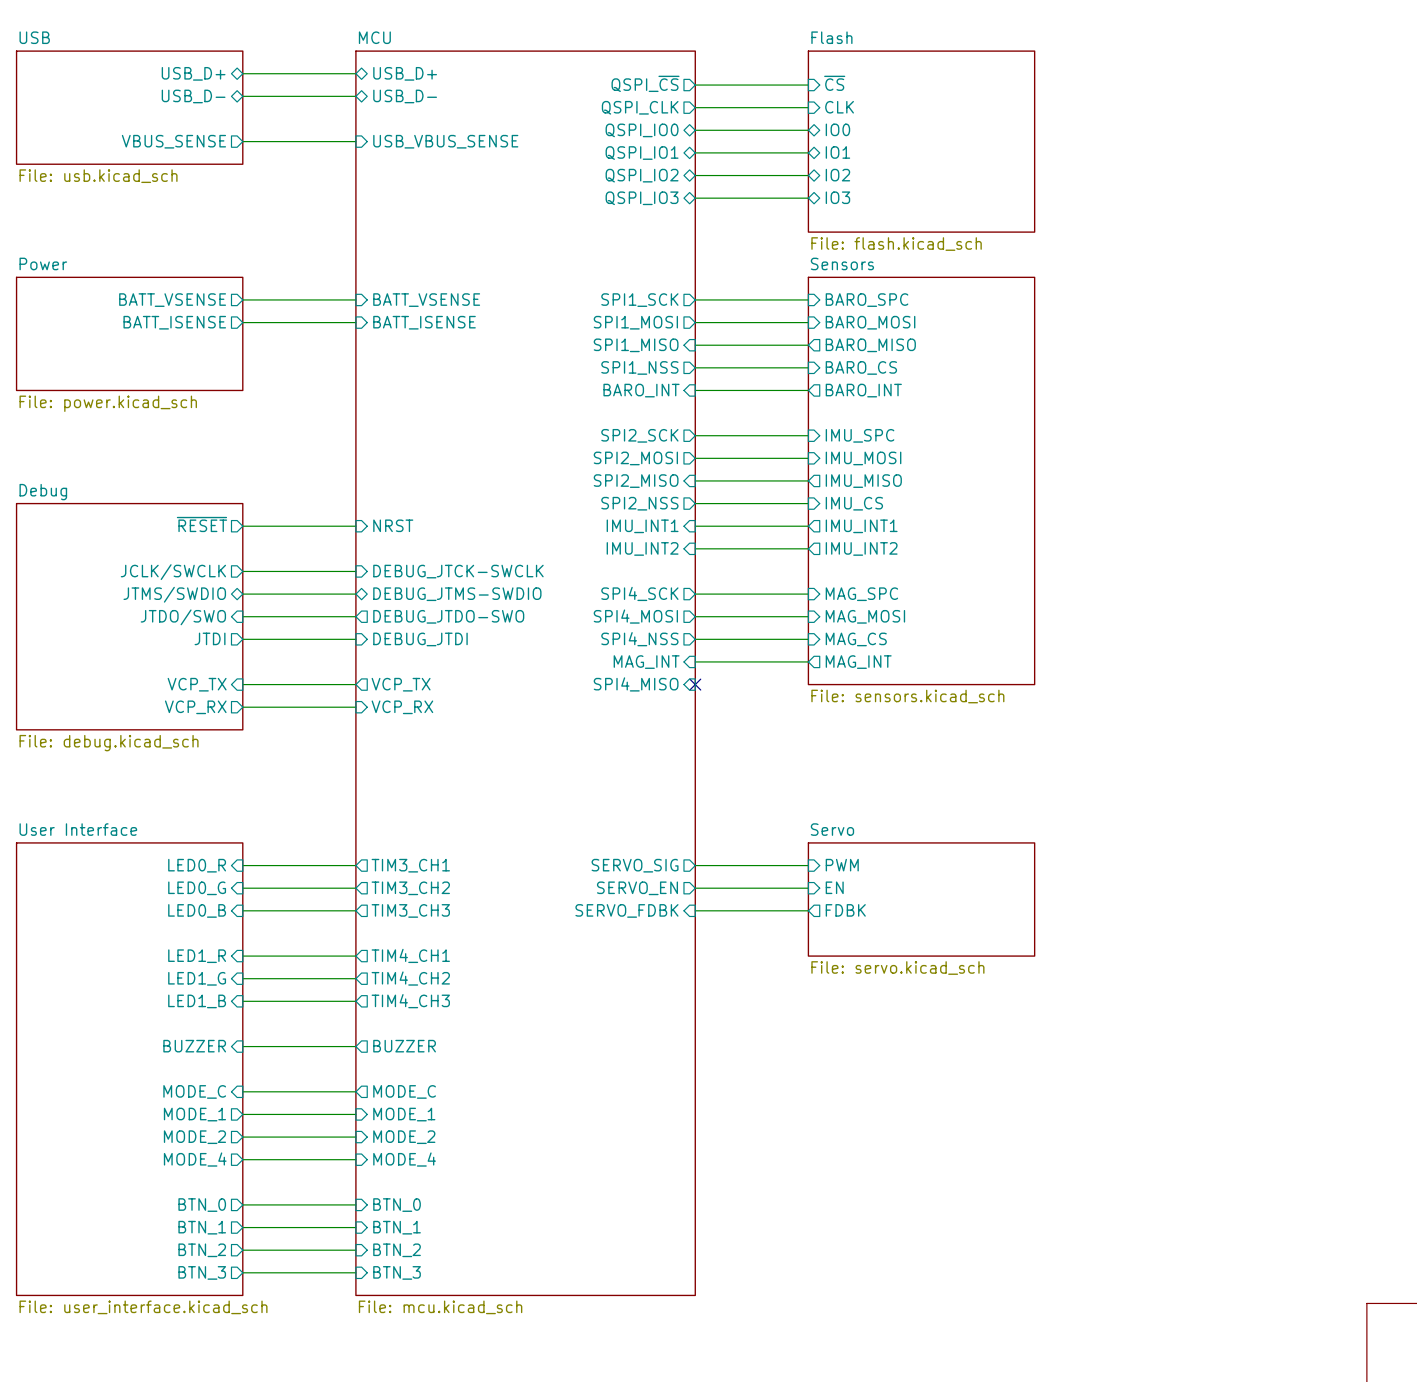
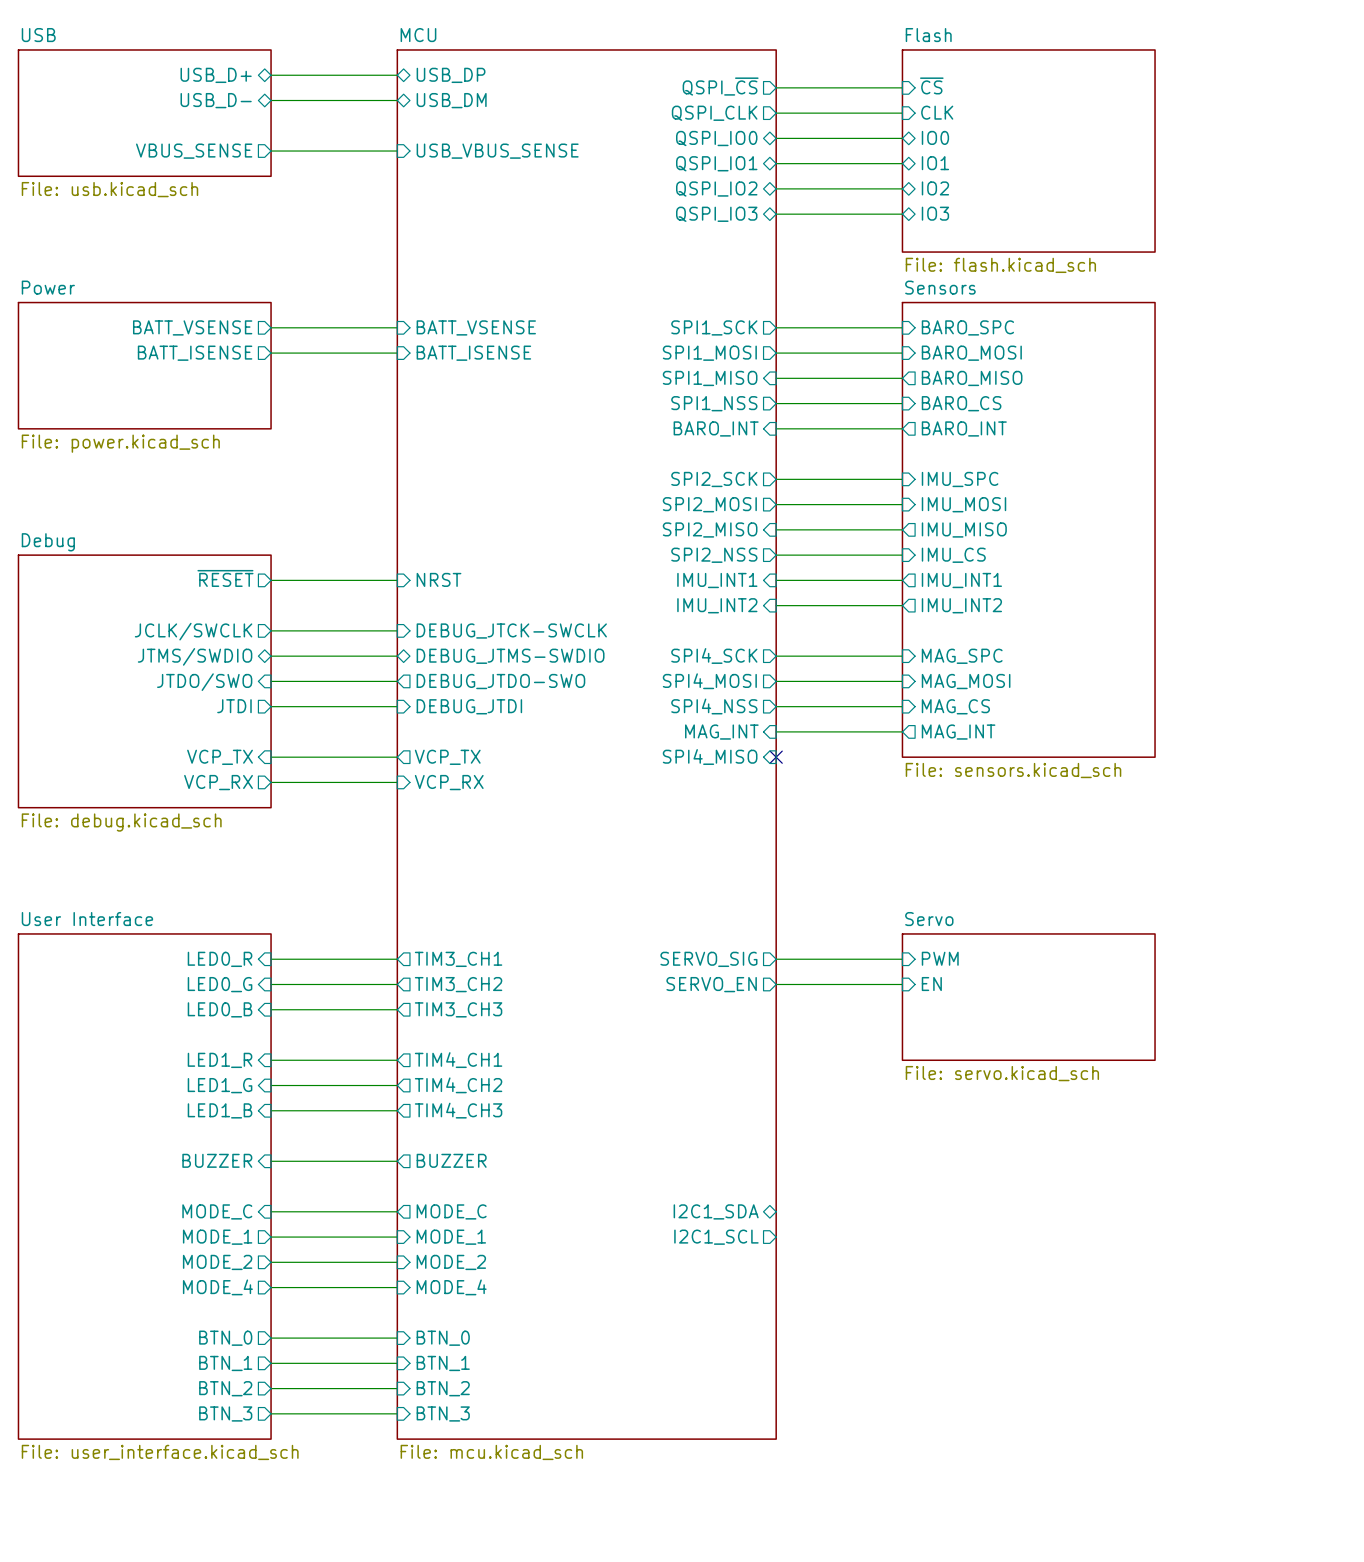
sheet pin: USB_D+ (405, 73) -> USB_DP (451, 75)
sheet pin: USB_D- (405, 96) -> USB_DM (451, 100)
sheet pin: SERVO_FDBK (626, 910) -> none
wire: (695, 910) (808, 910) -> none
sheet pin: FDBK (845, 910) -> none
sheet pin: none -> I2C1_SDA (716, 1211)
sheet pin: none -> I2C1_SCL (716, 1237)

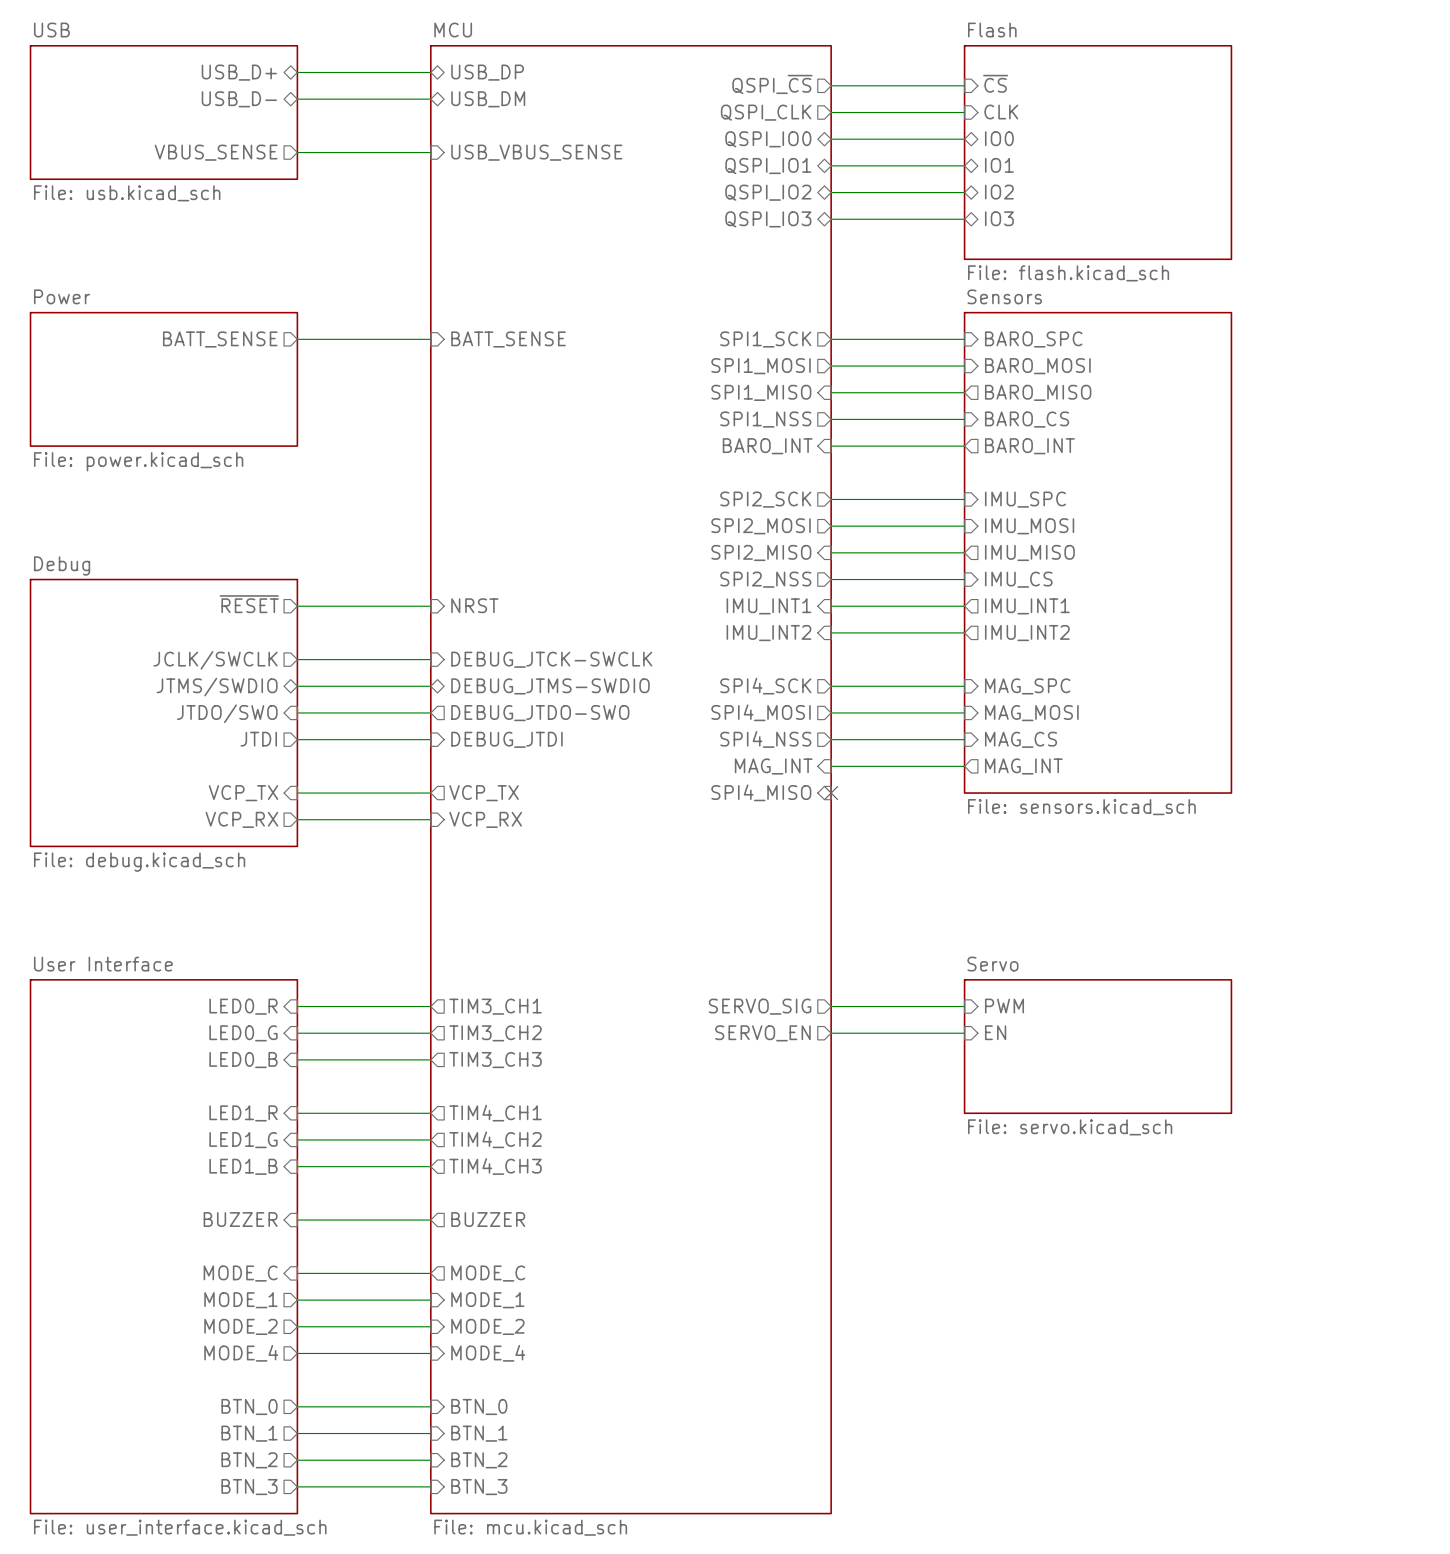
sheet pin: BATT_VSENSE (192, 327) -> BATT_SENSE (220, 339)
sheet pin: BATT_VSENSE (476, 327) -> BATT_SENSE (508, 339)
sheet pin: BATT_ISENSE (195, 353) -> none
wire: (271, 353) (397, 353) -> none
sheet pin: BATT_ISENSE (473, 353) -> none
sheet pin: I2C1_SDA (716, 1211) -> none
sheet pin: I2C1_SCL (716, 1237) -> none

